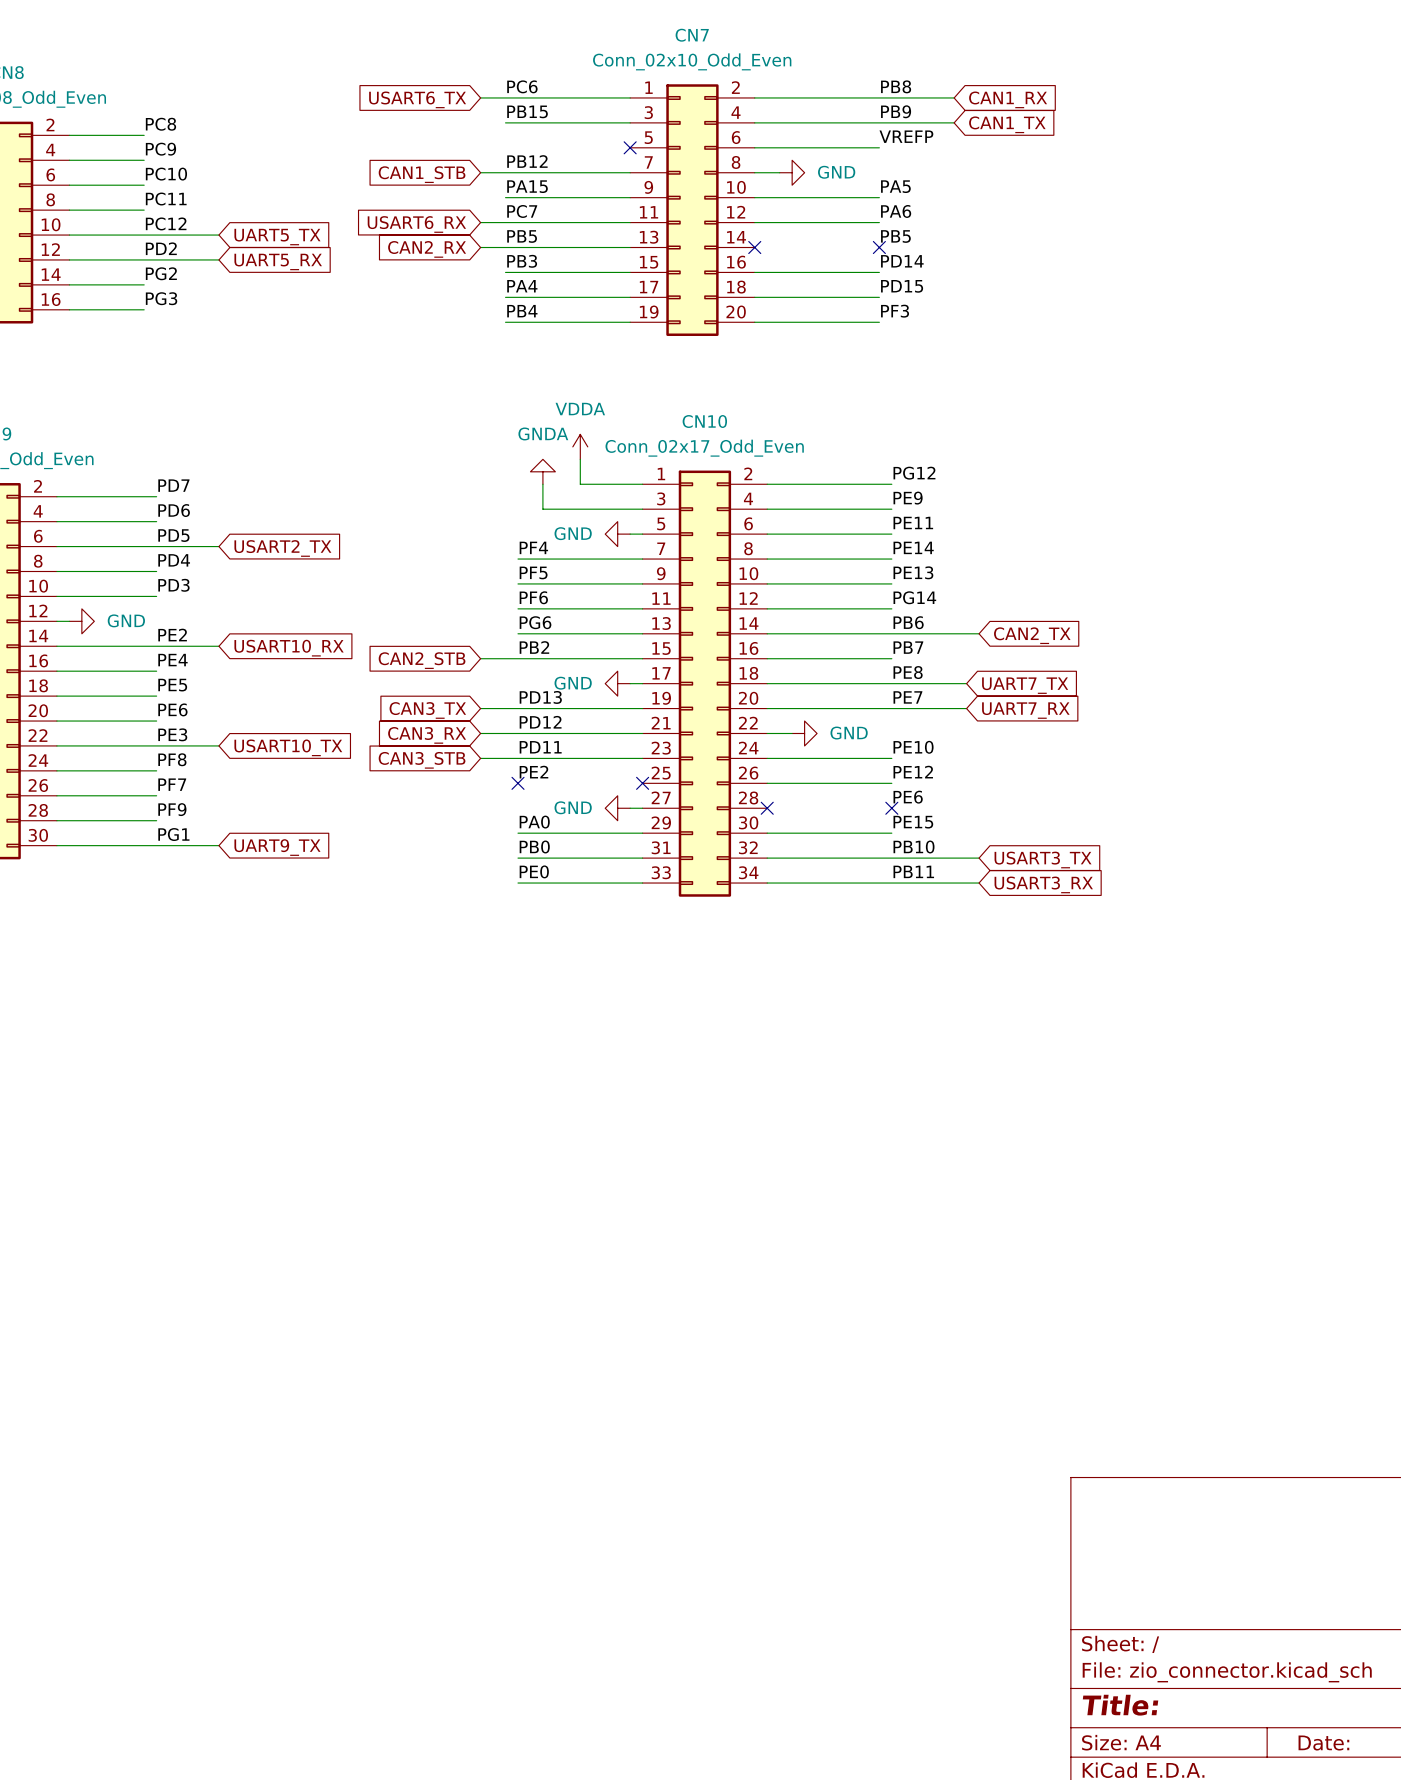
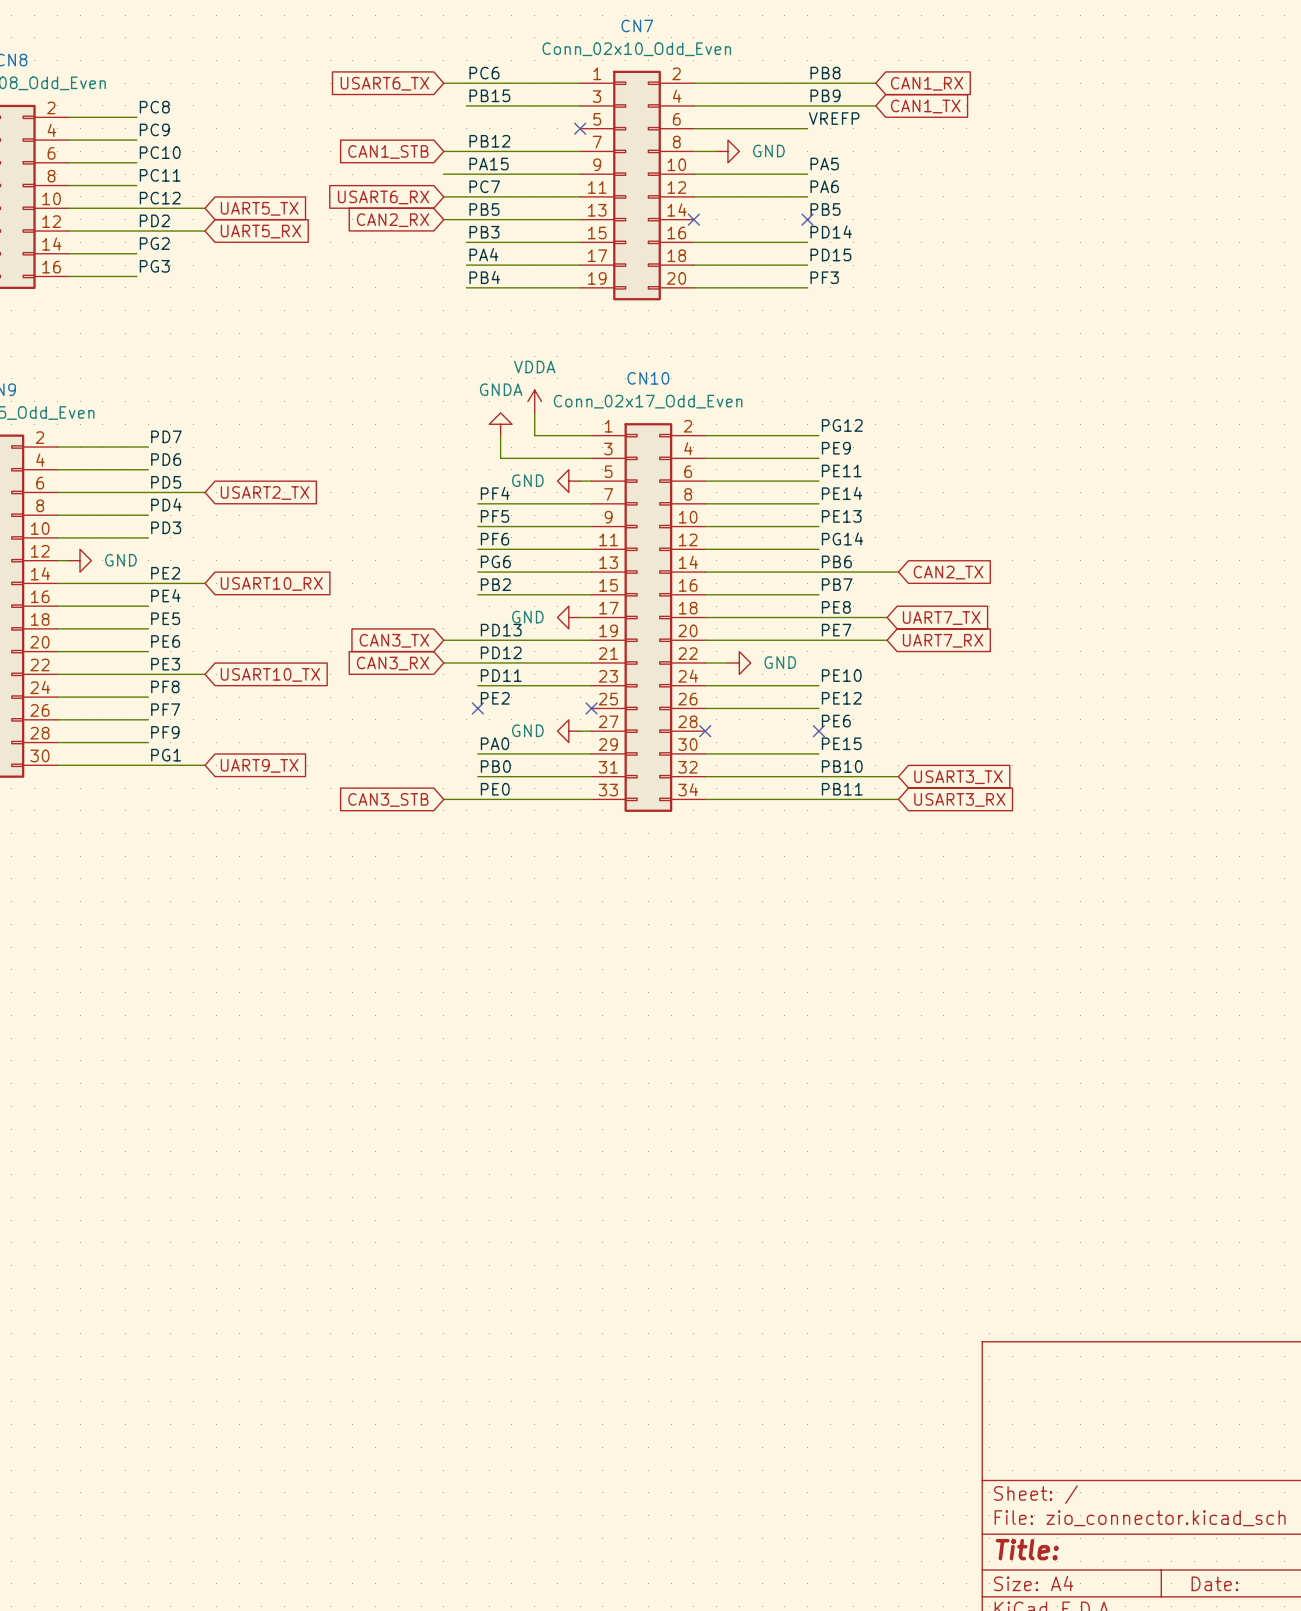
wire: none -> (443, 174) (466, 174)
wire: (480, 658) (518, 658) -> none
global label: CAN2_STB (422, 660) -> none
wire: (480, 758) (518, 758) -> (443, 799) (477, 799)
global label position: CAN3_STB (422, 760) -> CAN3_STB (388, 799)

